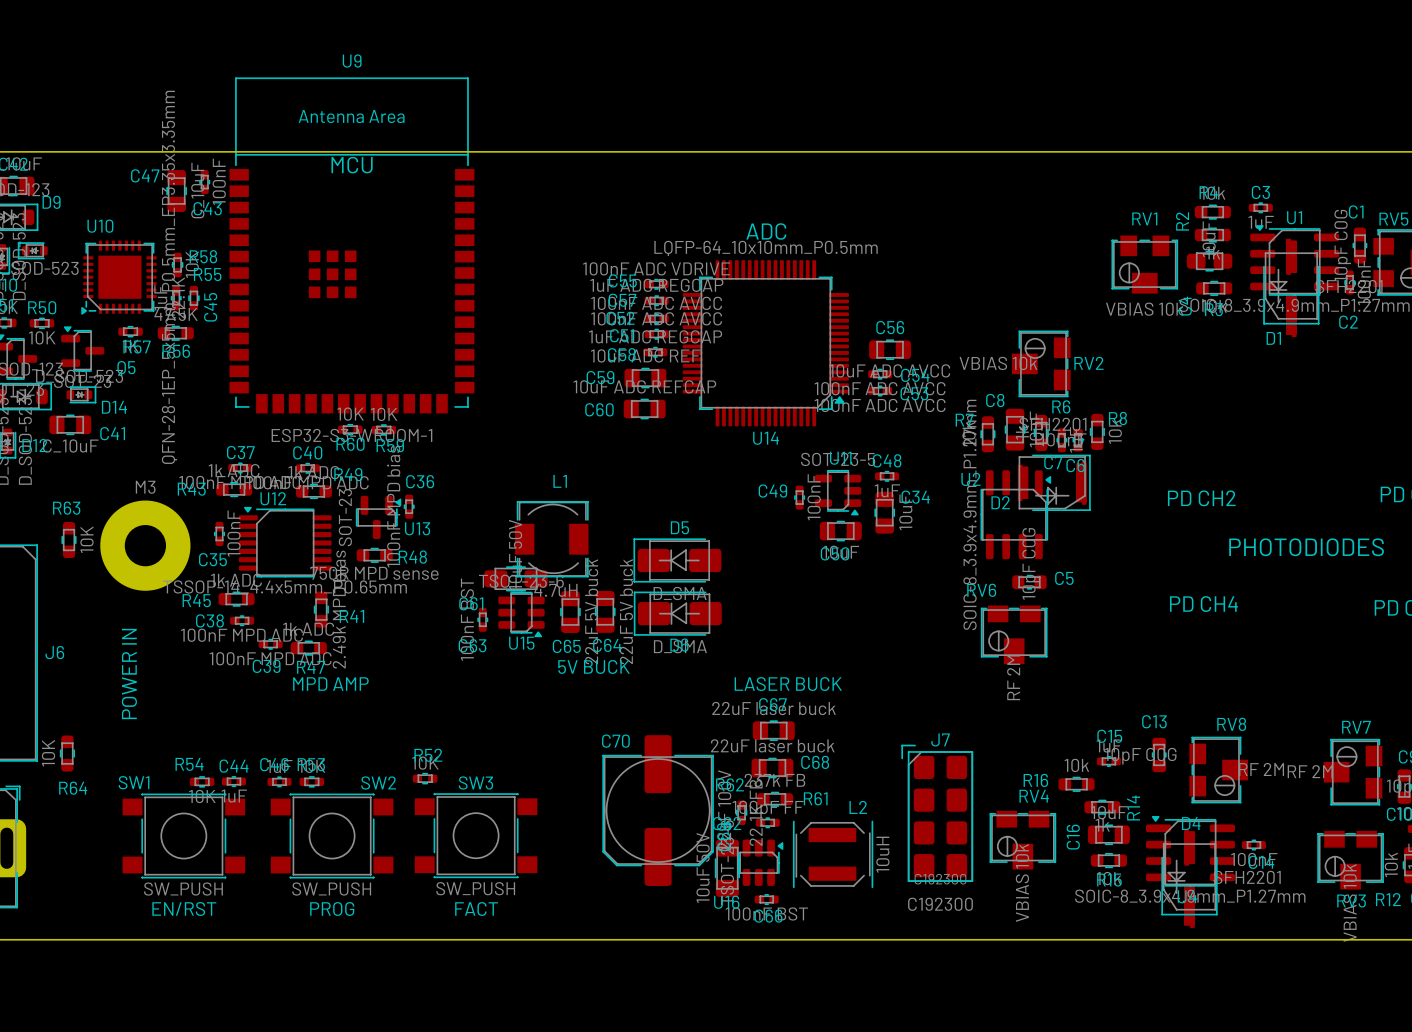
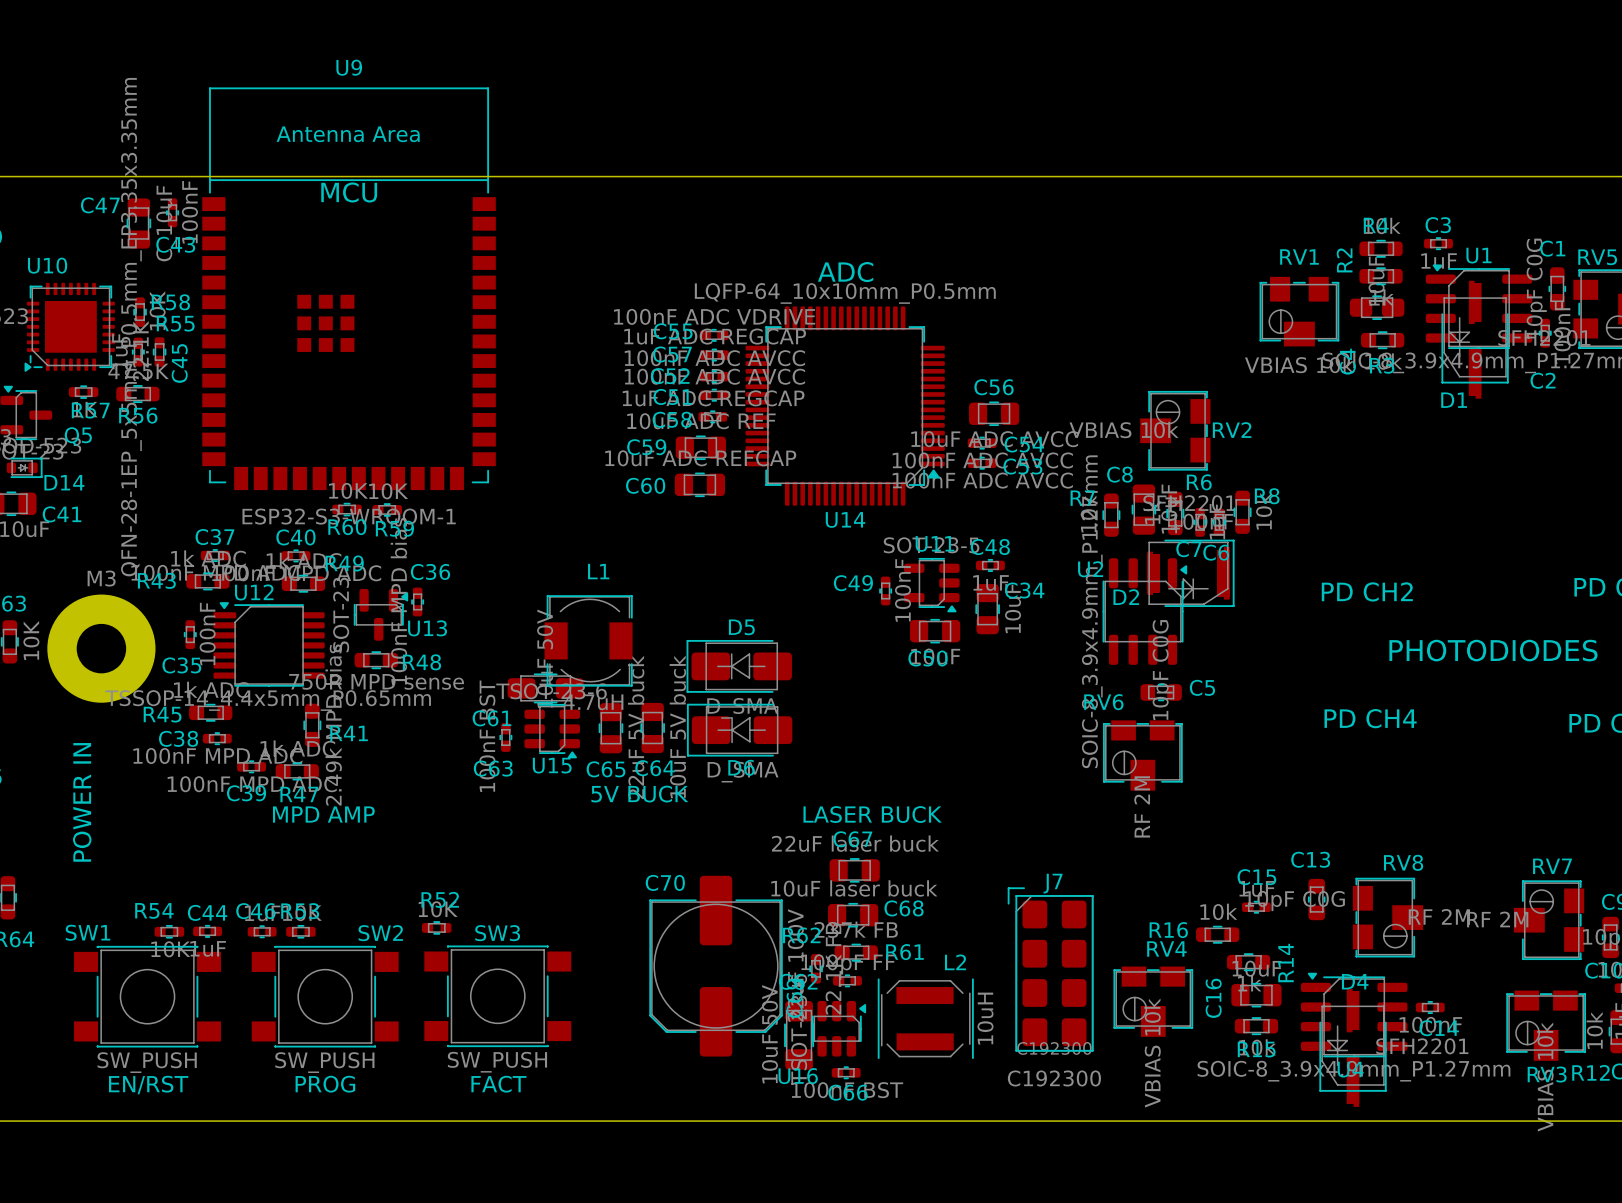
C64 value: 22uF 5V buck (626, 611) -> 10uF 5V buck (677, 726)
C68 value: 22uF laser buck (772, 745) -> 10uF laser buck (854, 888)

